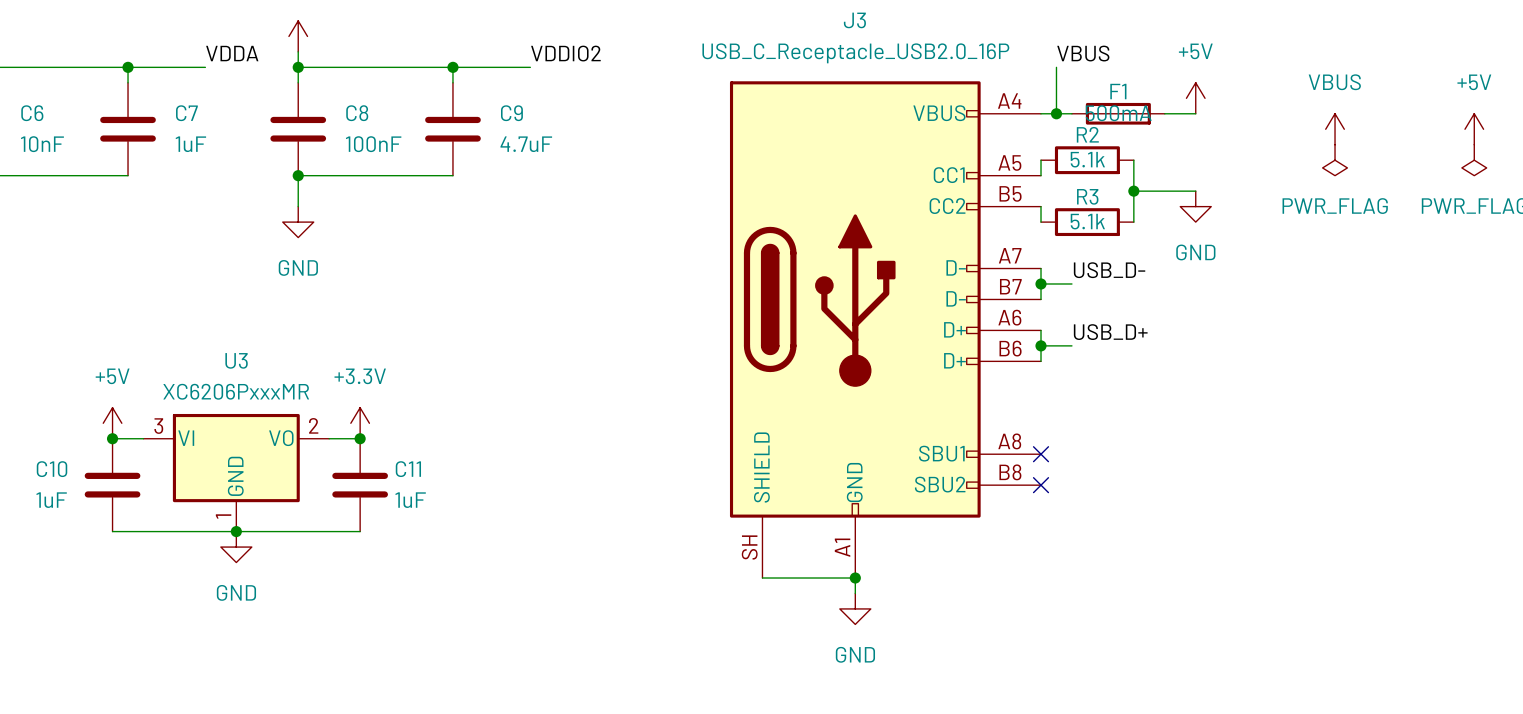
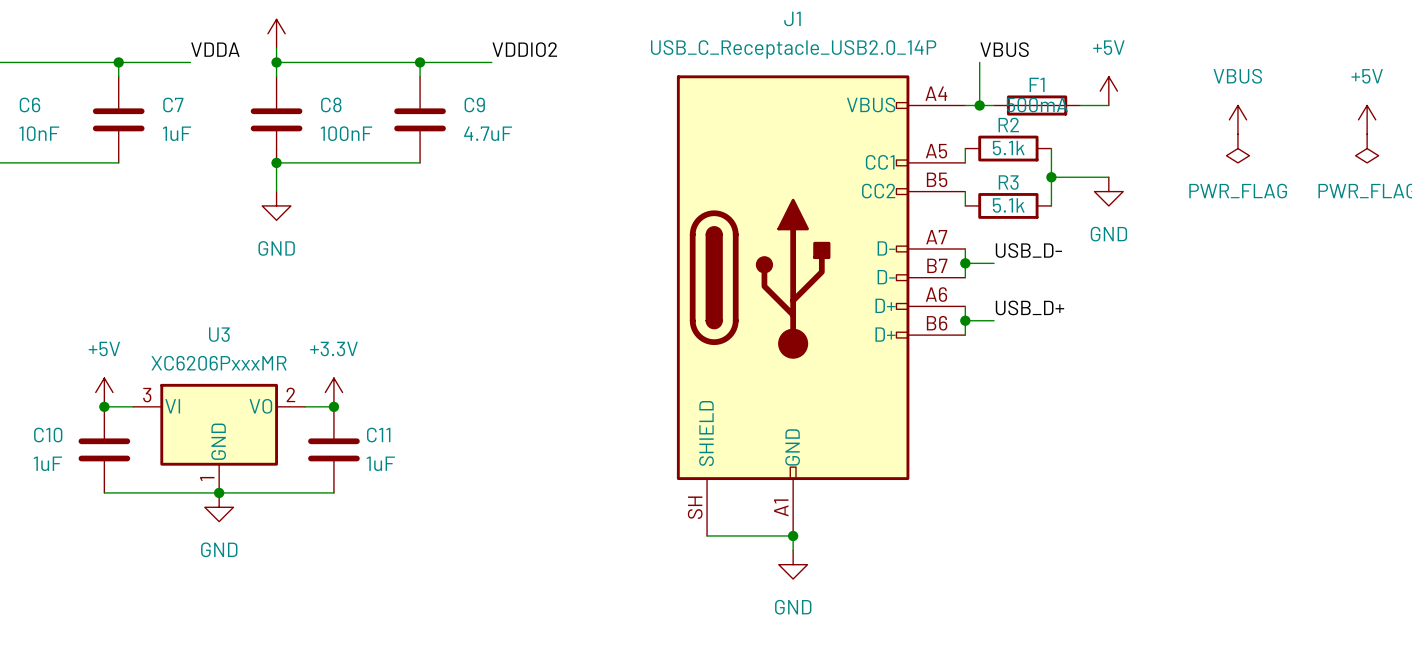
J3: USB_C_Receptacle_USB2.0_16P (885, 329) -> none
J1: none -> USB_C_Receptacle_USB2.0_14P (821, 305)
no-connect mark: (1041, 454) -> none
no-connect mark: (1041, 485) -> none

